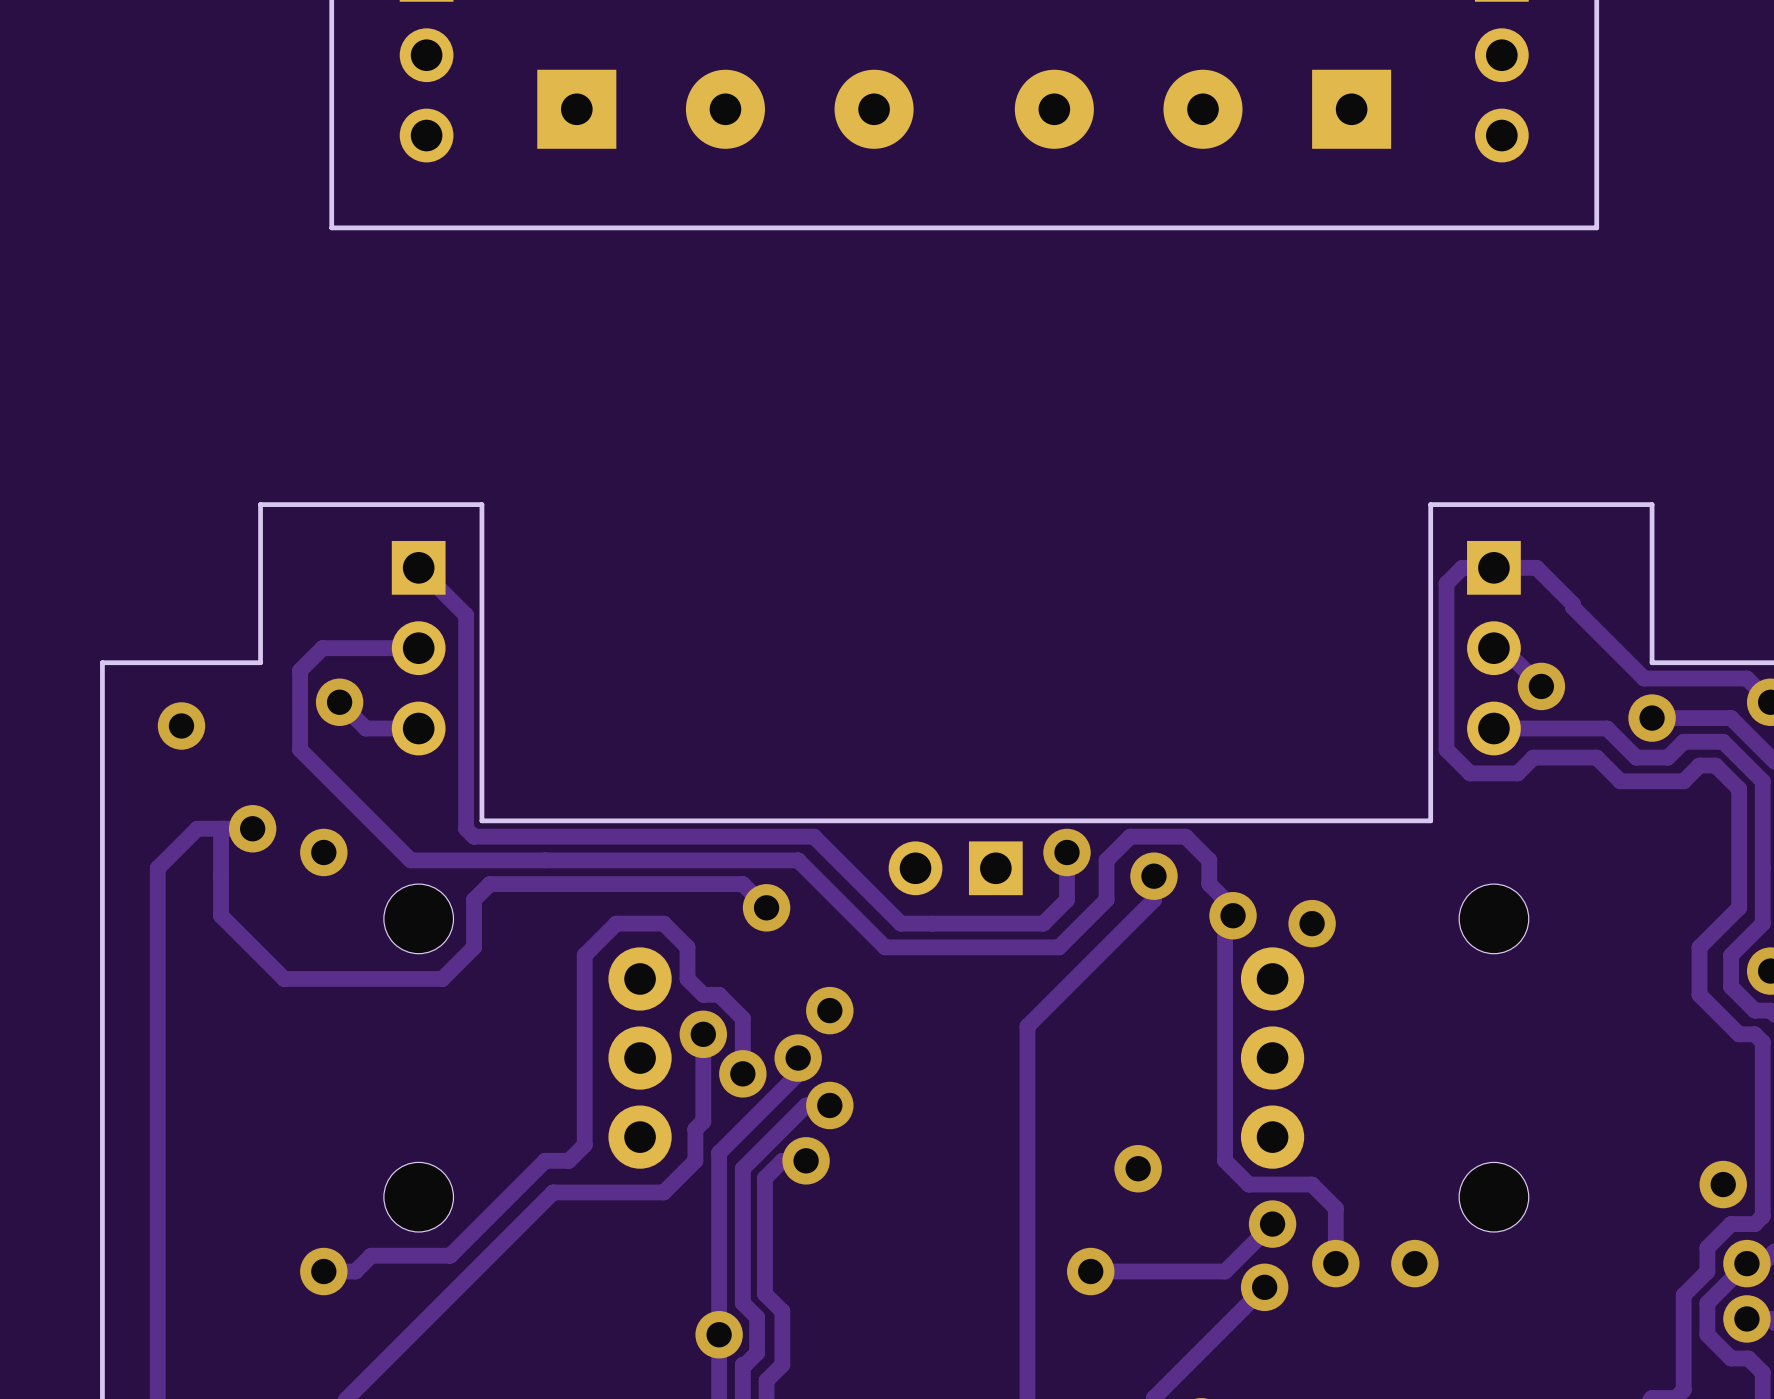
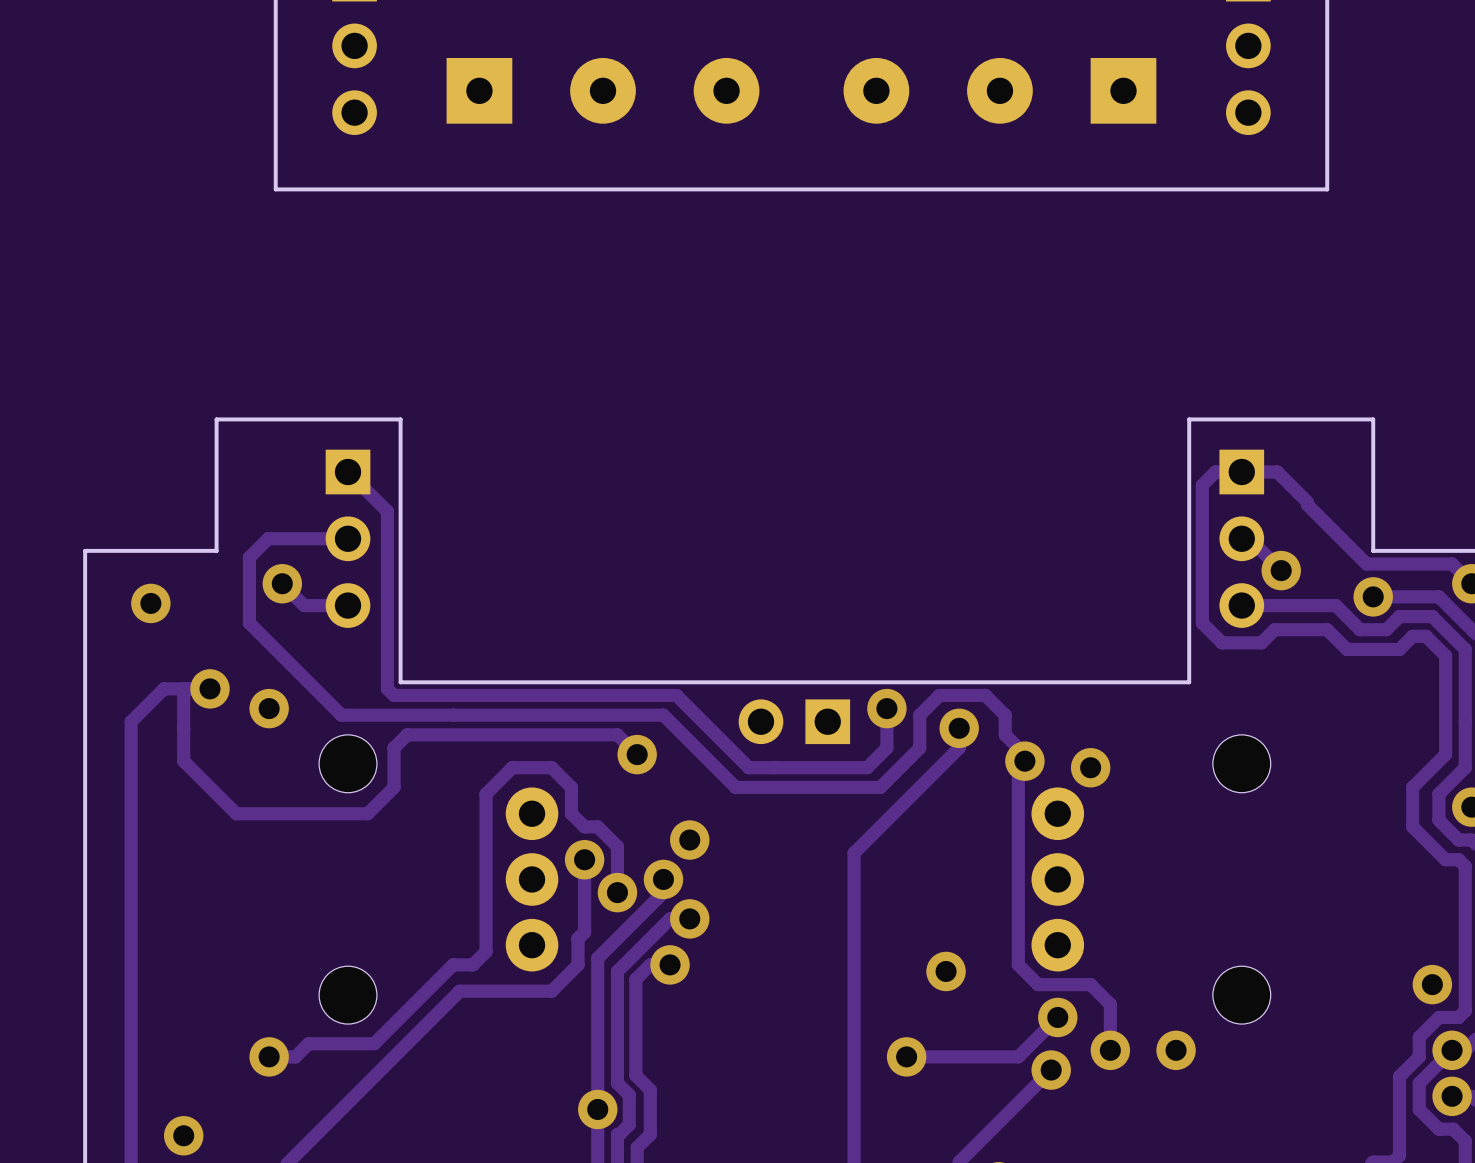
via: none -> (183, 1135)

